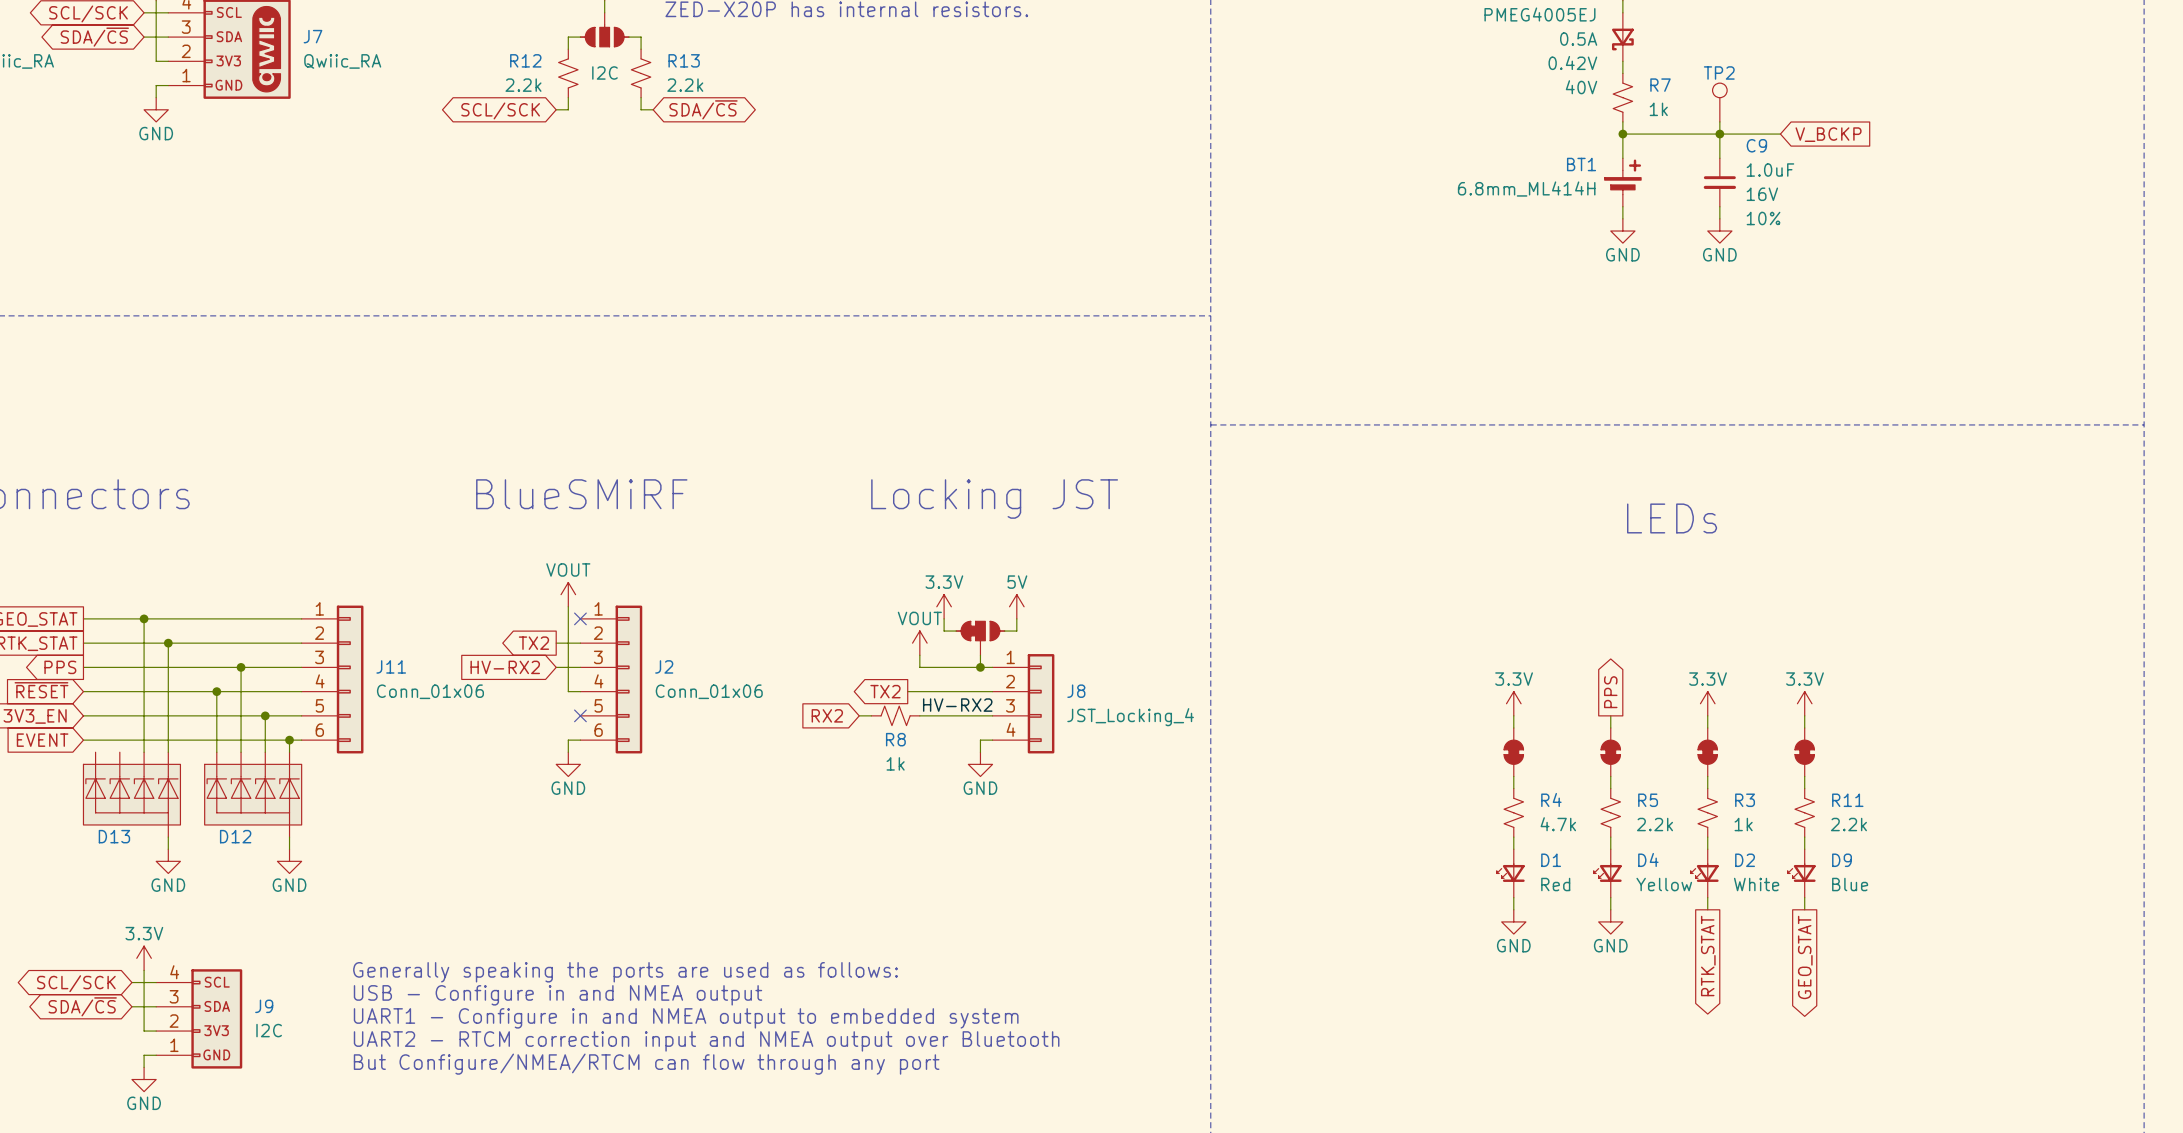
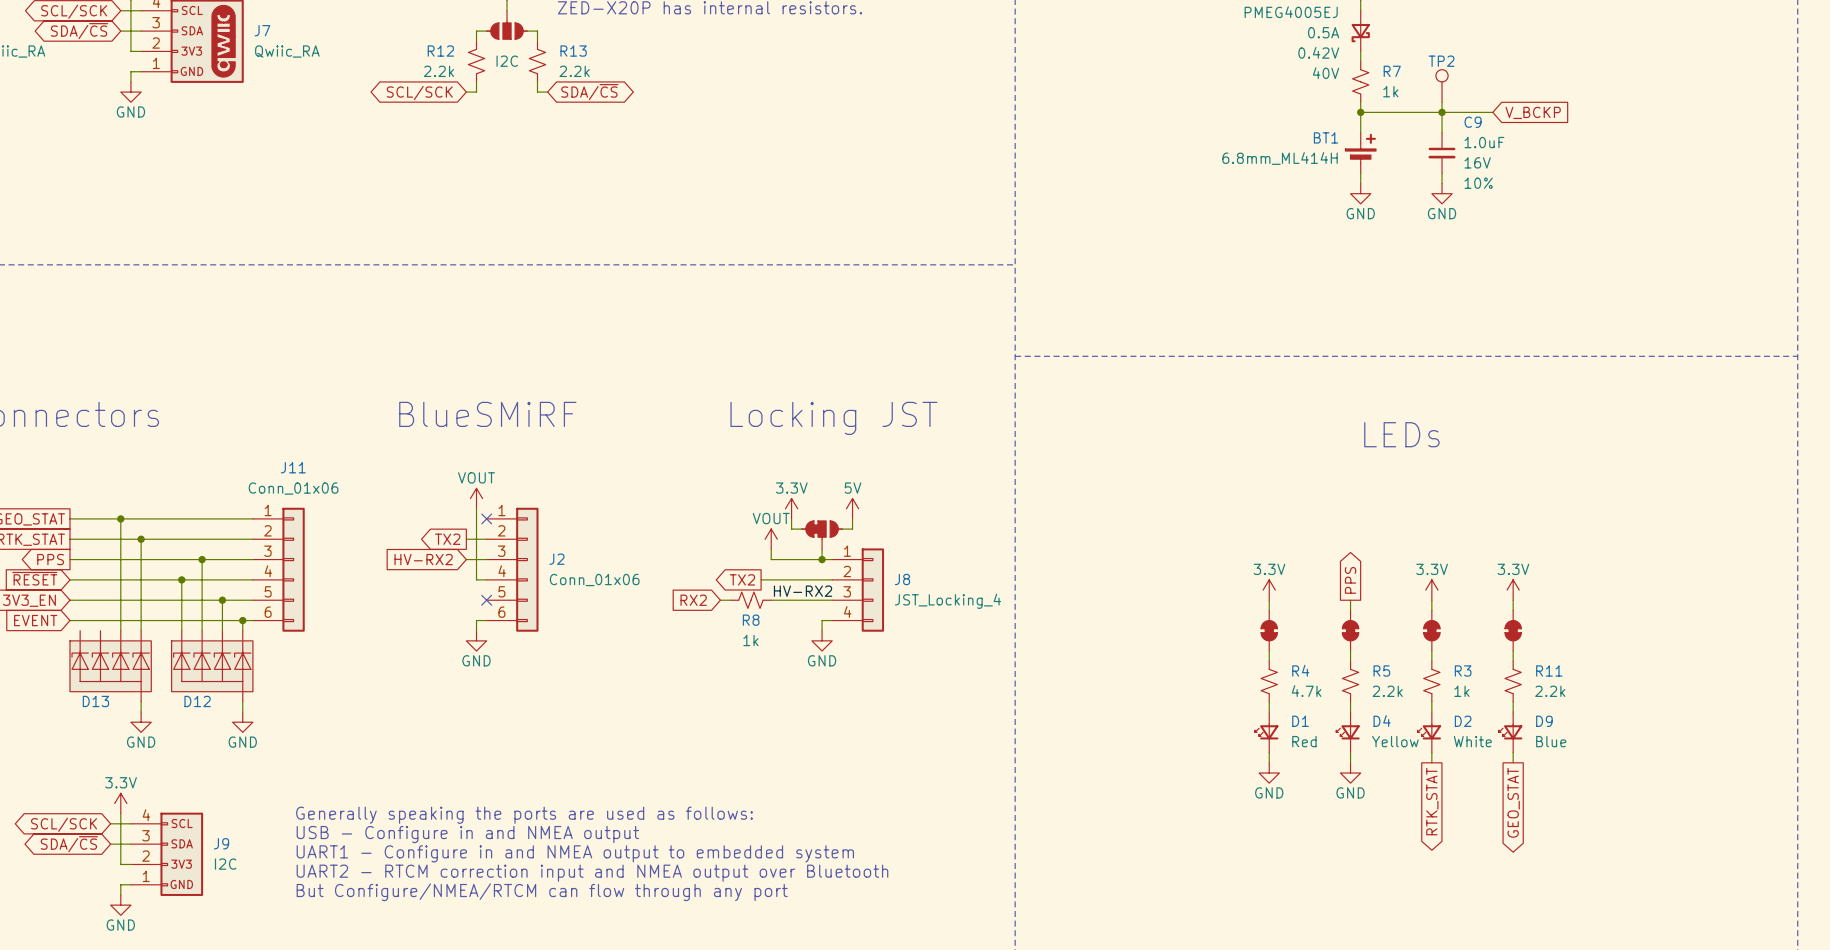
J11 name position: J11 (391, 666) -> J11 (293, 467)
J11 value position: Conn_01x06 (430, 691) -> Conn_01x06 (293, 488)

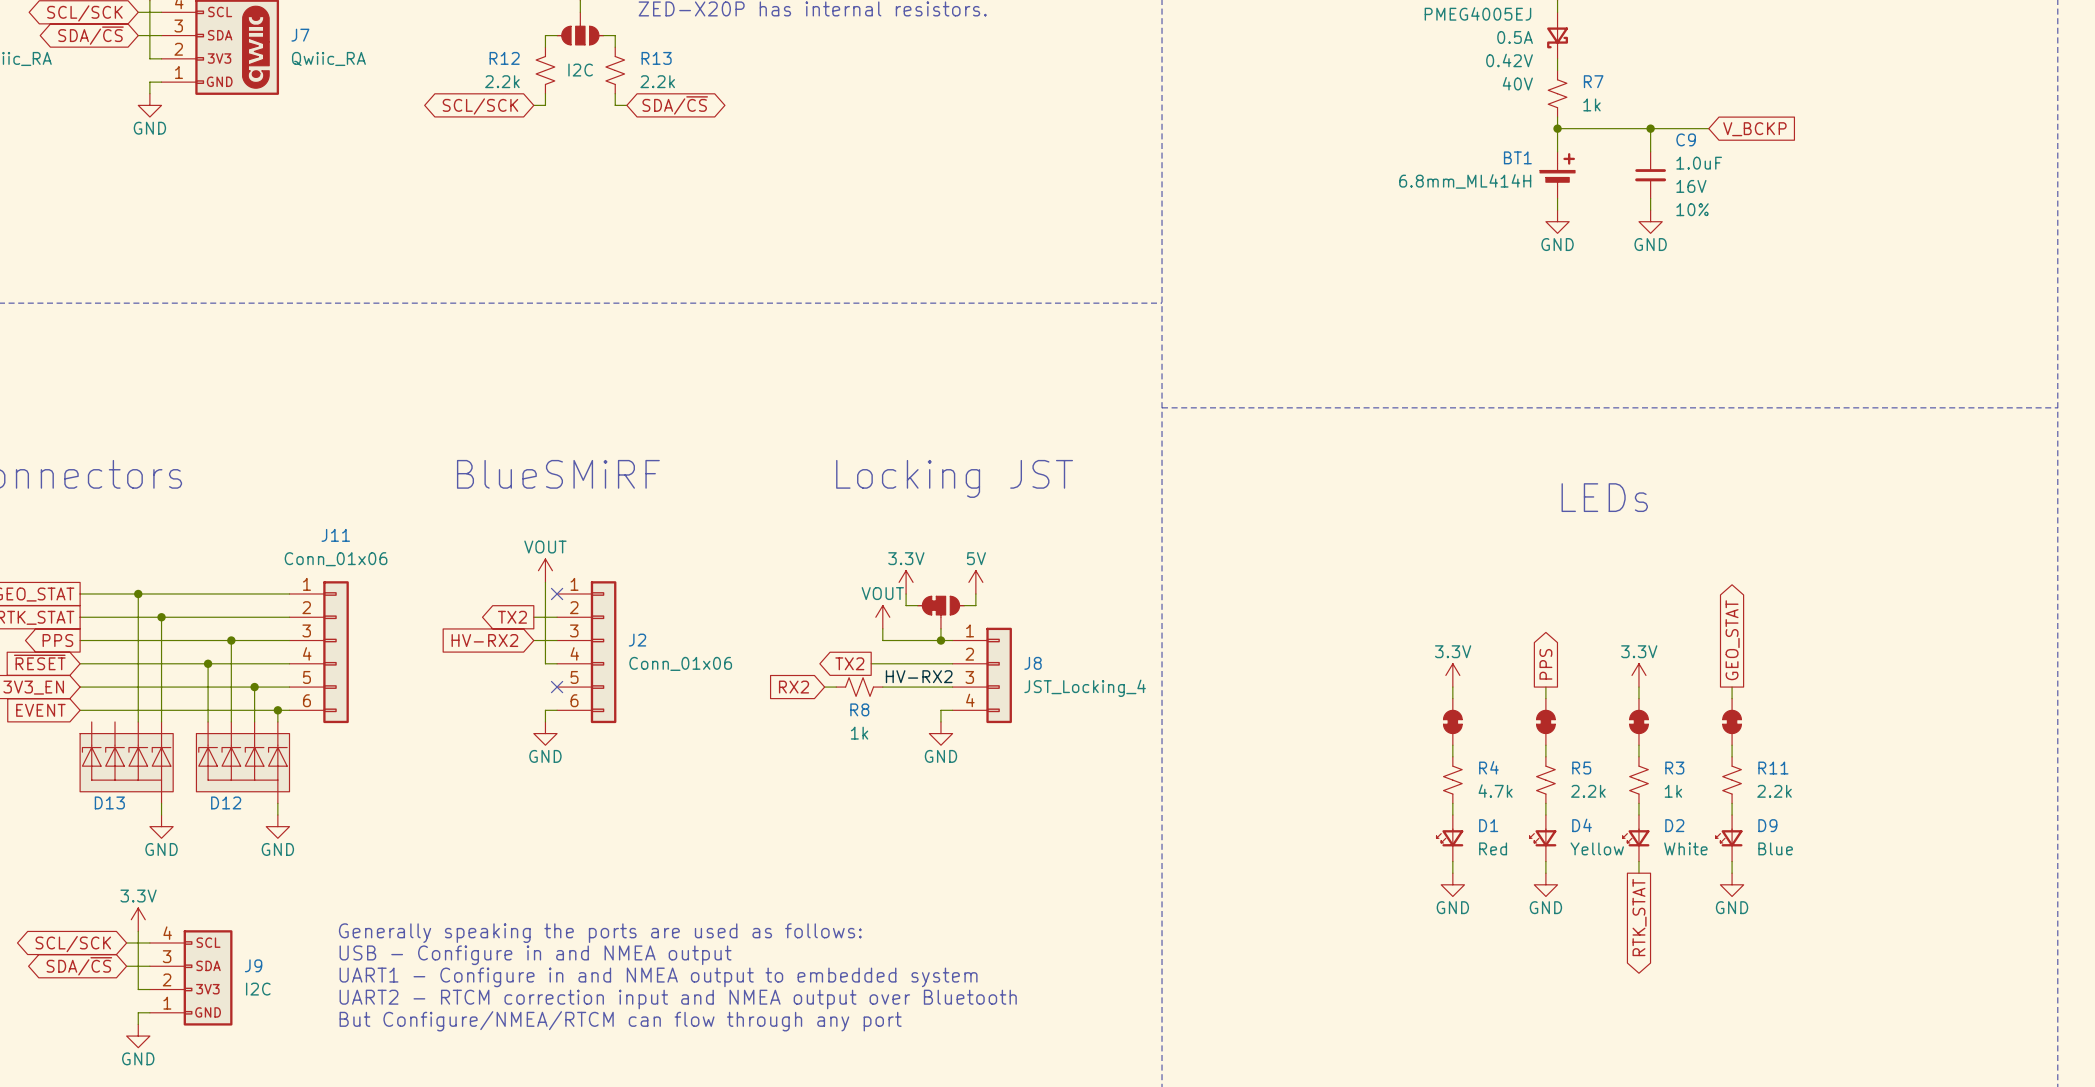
TP2: (1442, 85) -> none
wire: (1442, 102) (1442, 112) -> none
power symbol: 3.3V (1513, 590) -> none
power symbol: none -> GND (1732, 884)
global label rotation: 0° (1513, 802) -> 180° (1732, 640)
global label position: GEO_STAT (1513, 802) -> GEO_STAT (1732, 640)

